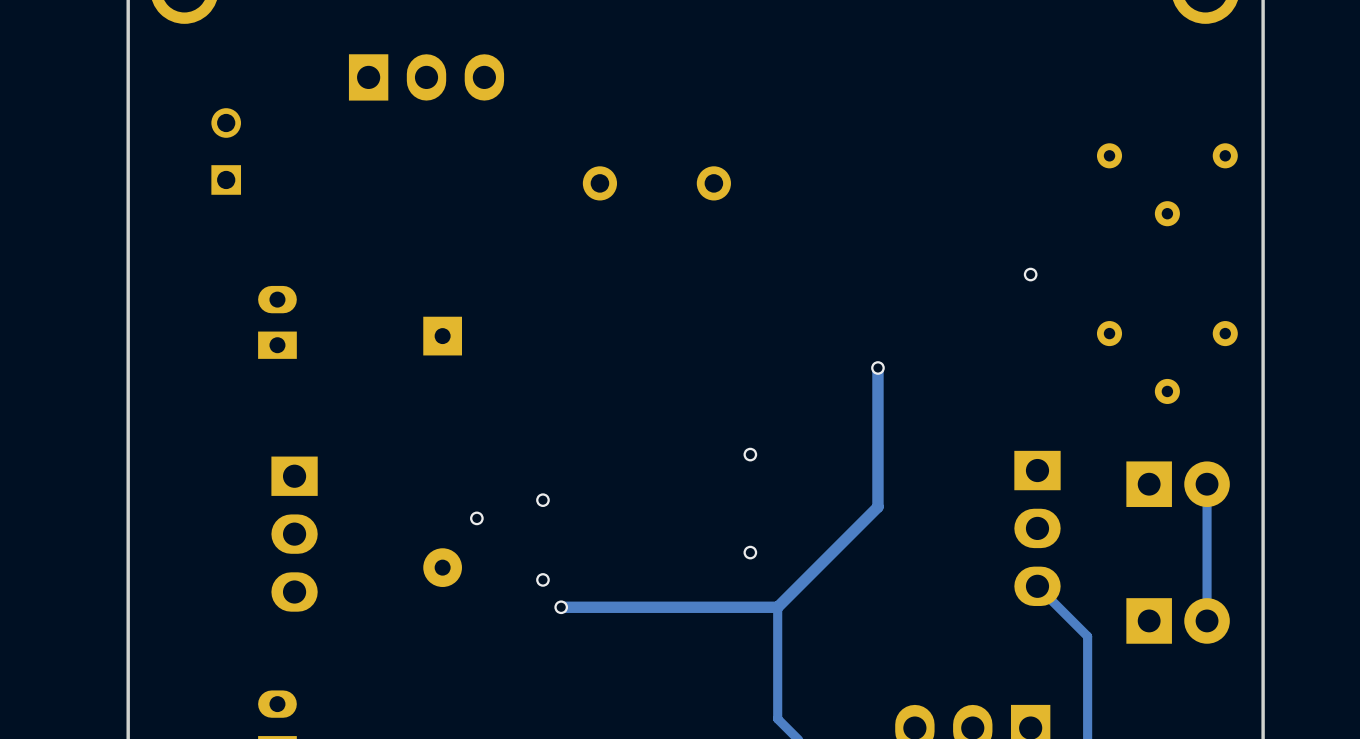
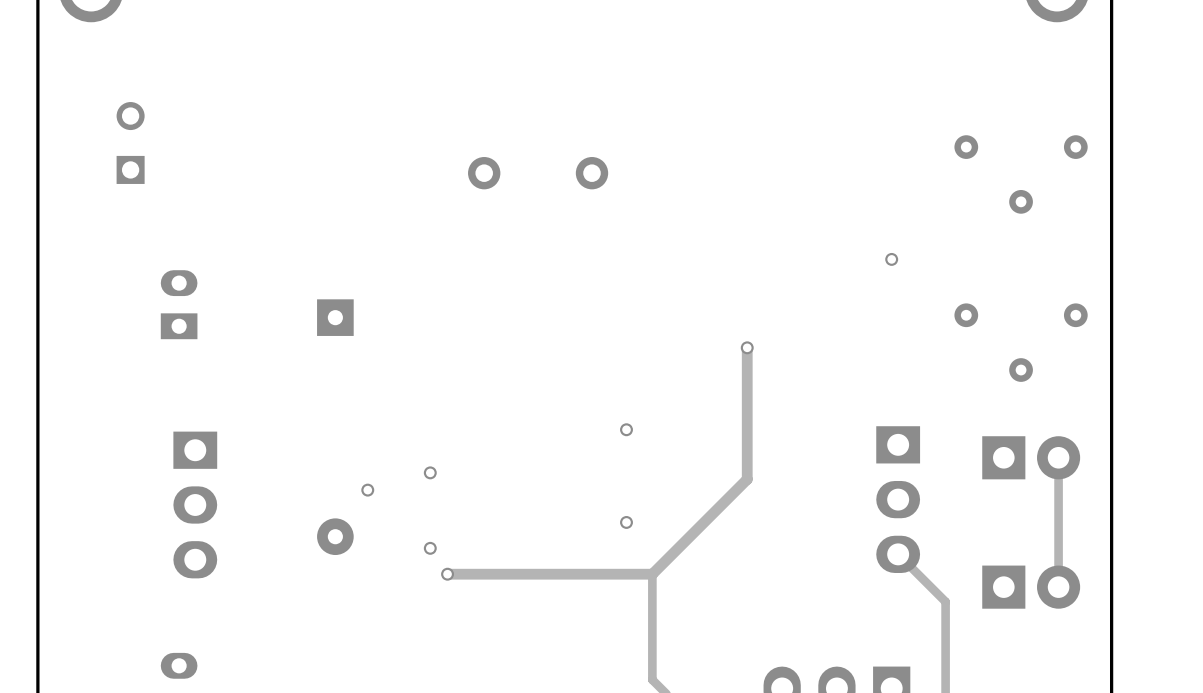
part: (426, 77) -> none

